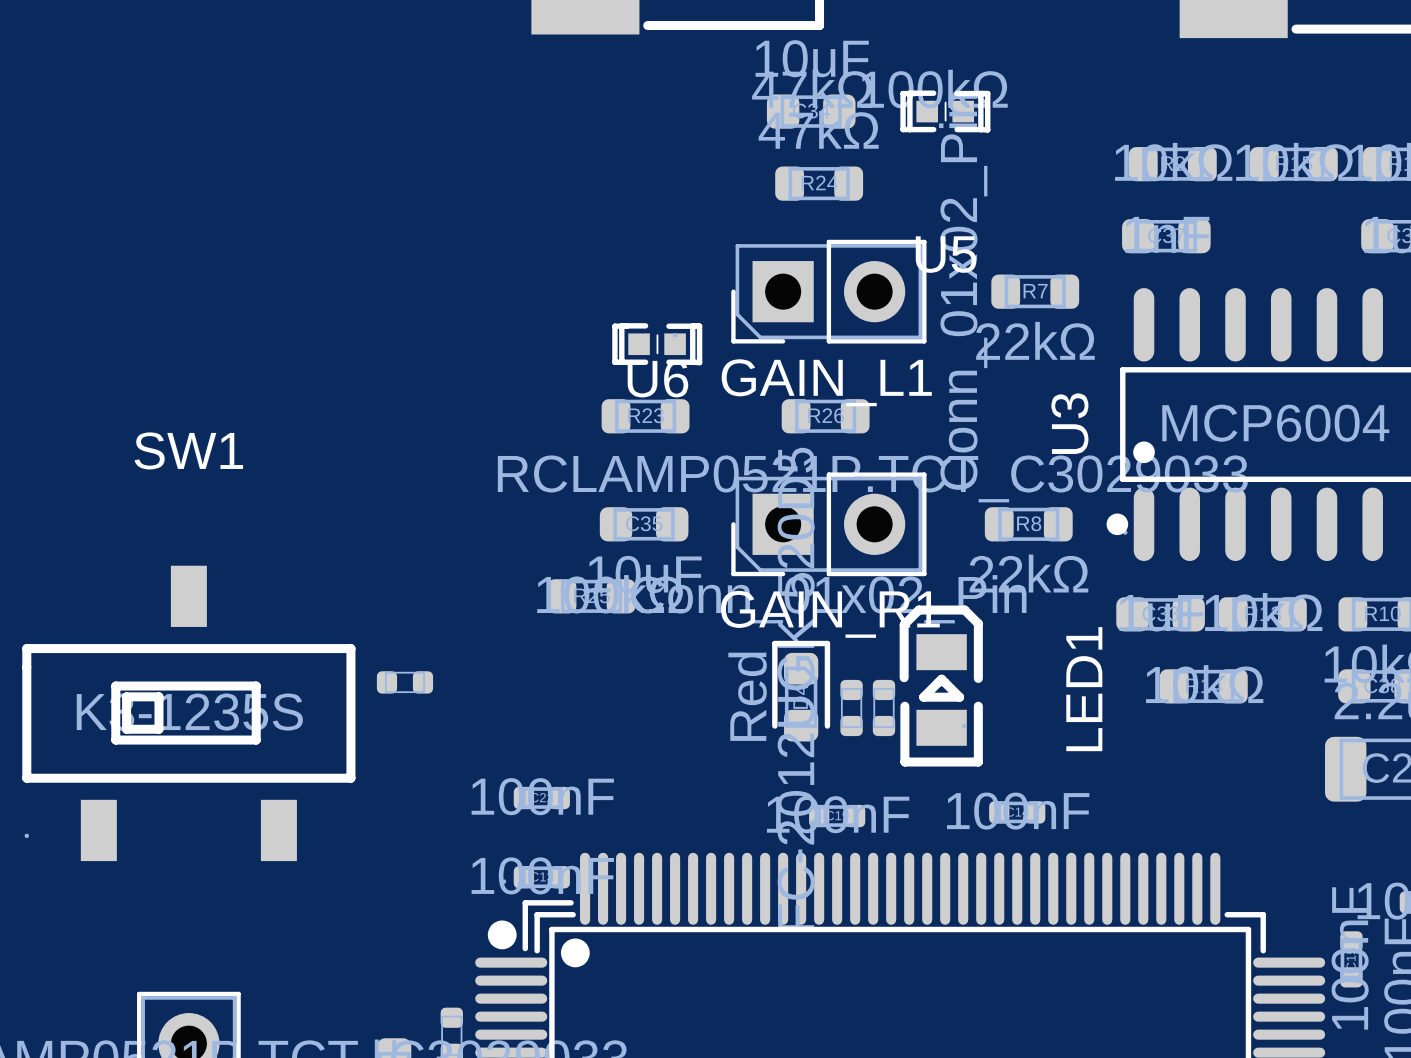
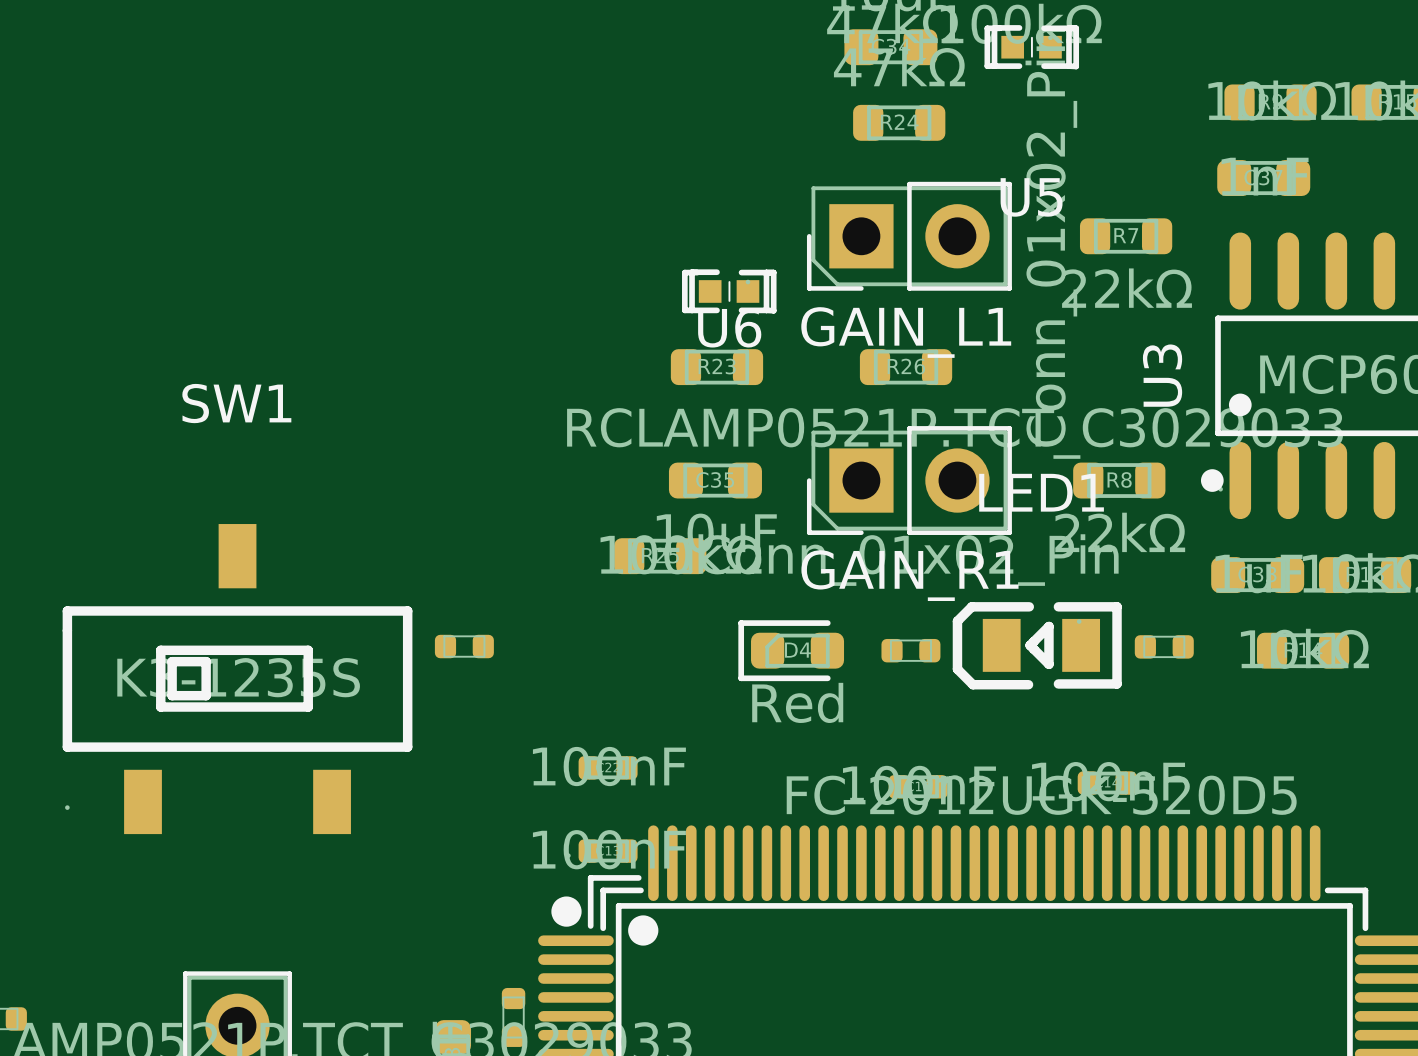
part: none -> (1164, 646)
part: none -> (910, 650)
LED1 rotation: 0° (941, 686) -> 90° counterclockwise (1037, 645)
D4 rotation: 0° (801, 691) -> 90° counterclockwise (791, 650)
D4 position: (801, 691) -> (791, 650)
part: (851, 707) -> none
part: (883, 707) -> none

